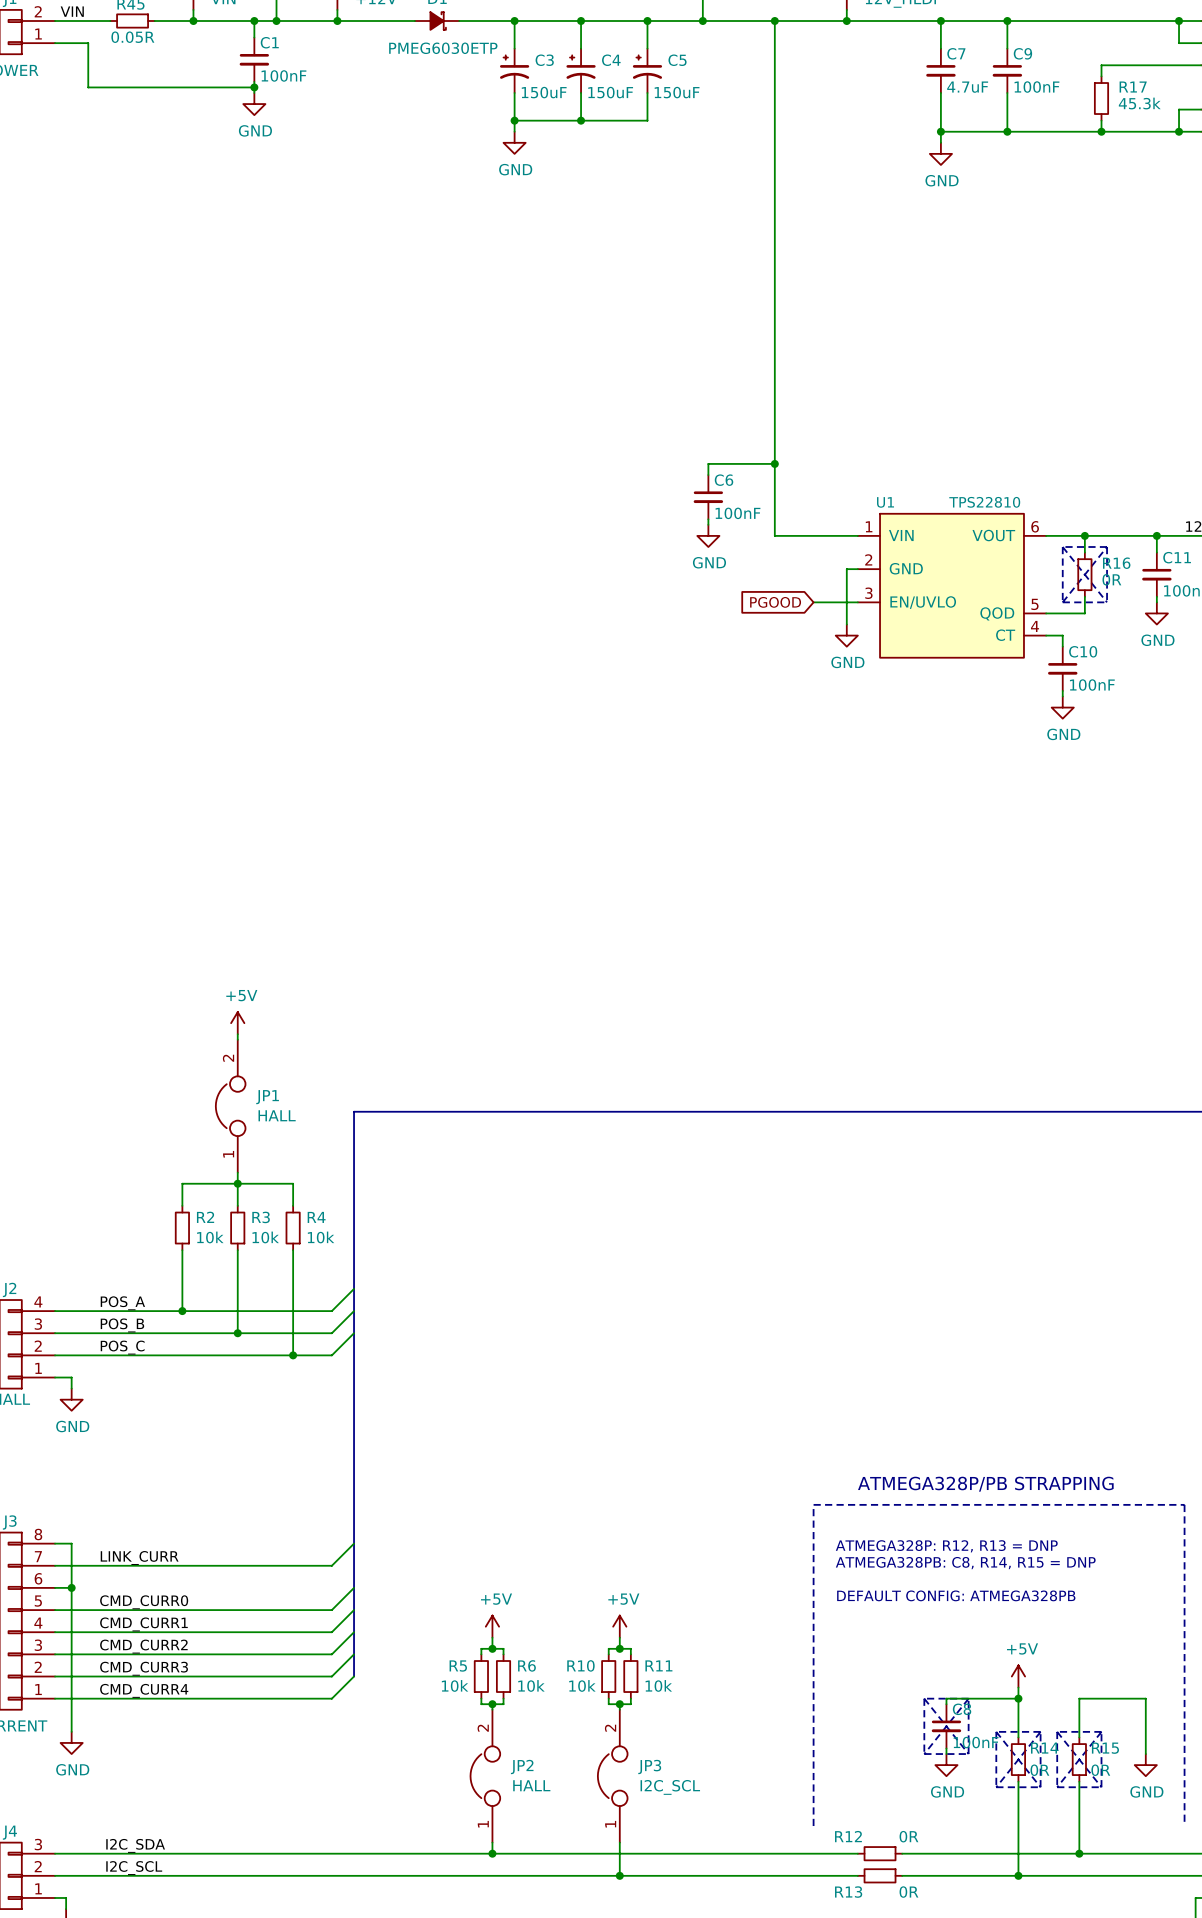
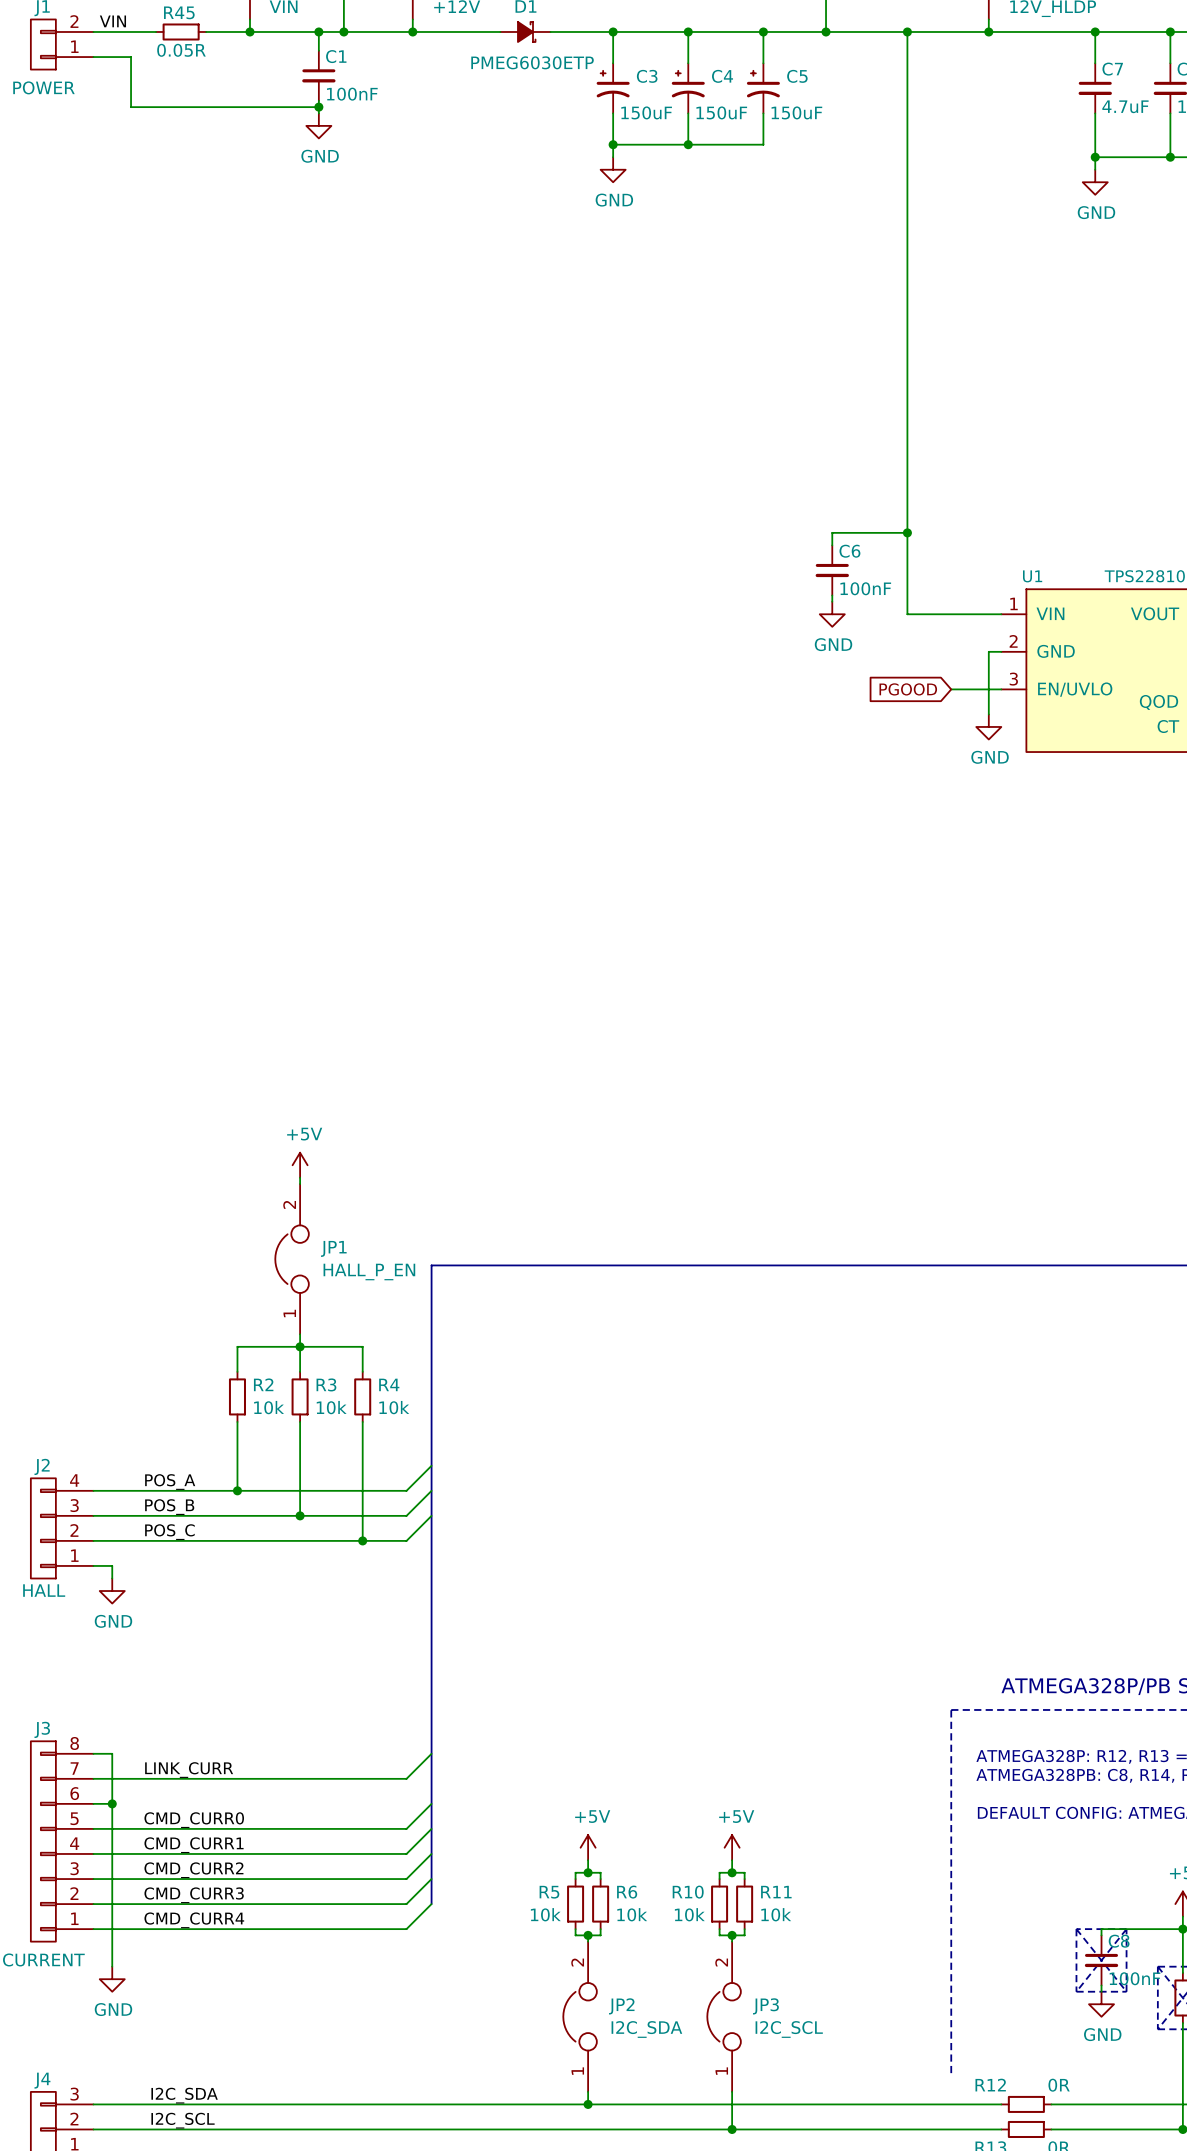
JP1 value: HALL (277, 1115) -> HALL_P_EN (369, 1272)
JP2 value: HALL (531, 1785) -> I2C_SDA (646, 2029)

